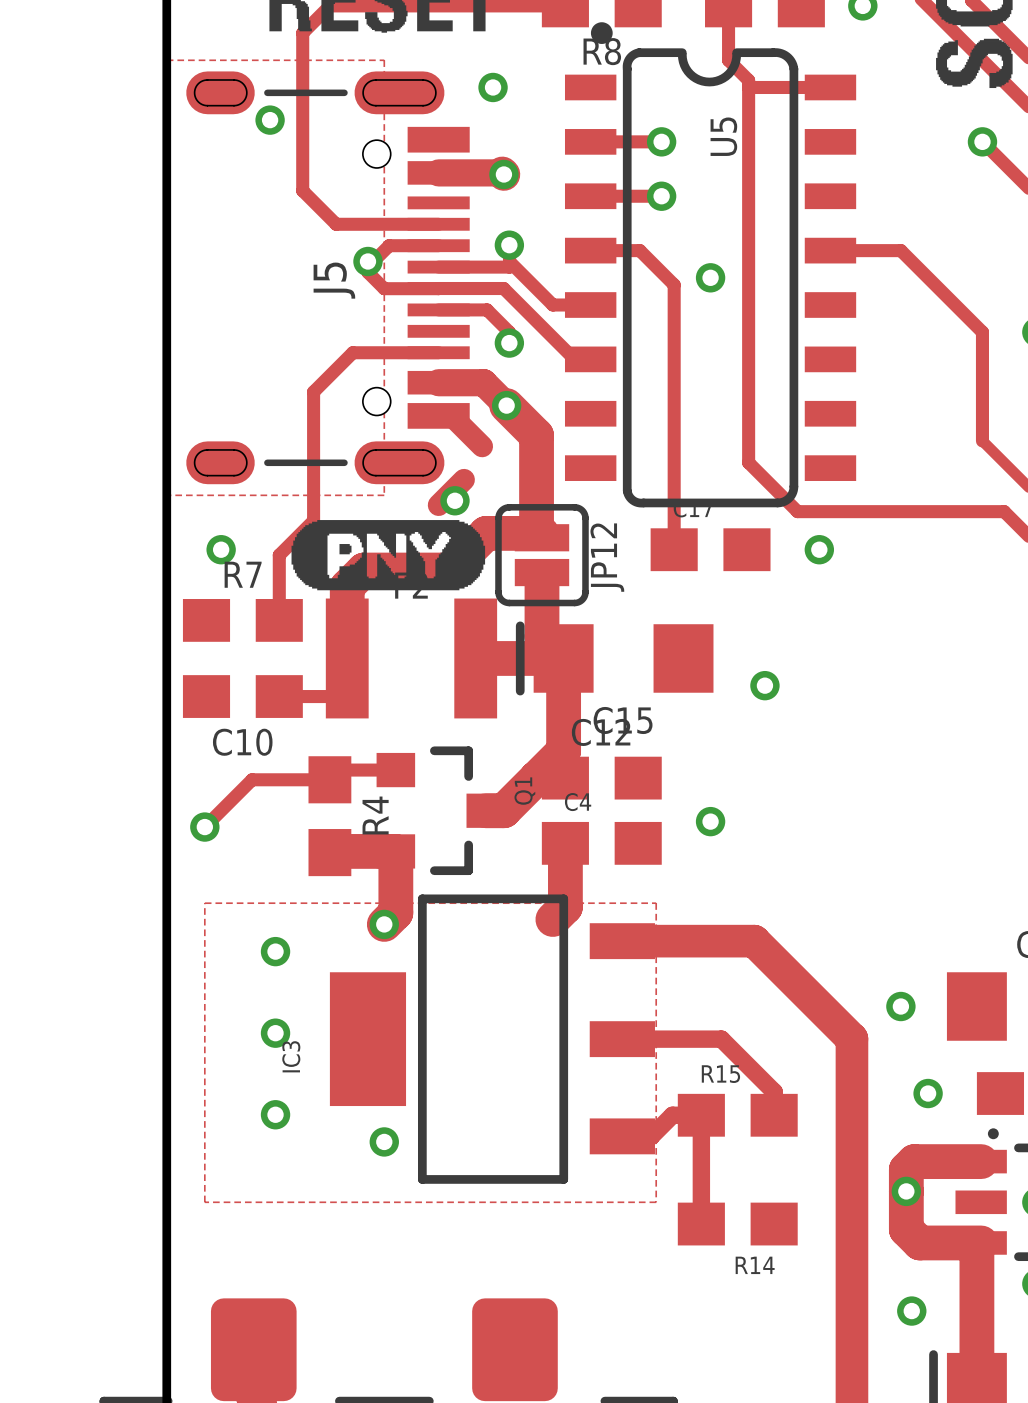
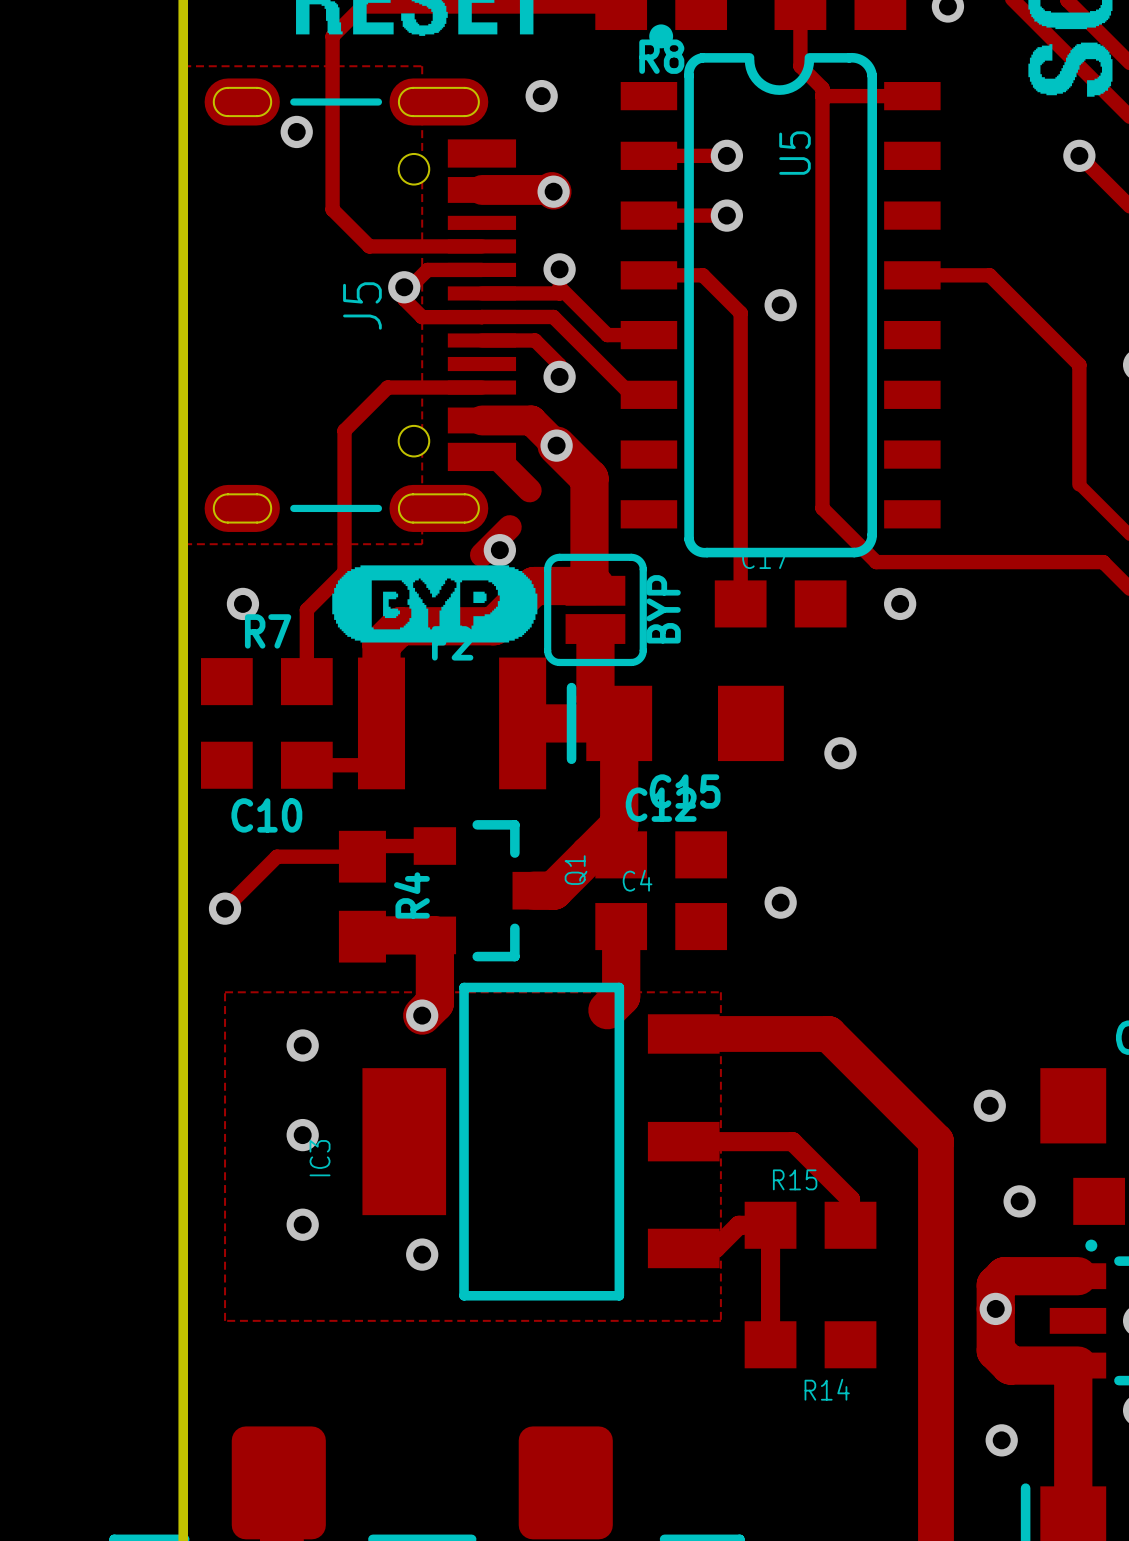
drawing shape: [291, 520, 486, 591] -> [332, 565, 538, 643]
JP12 name: JP12 (607, 557) -> BYP (663, 609)

